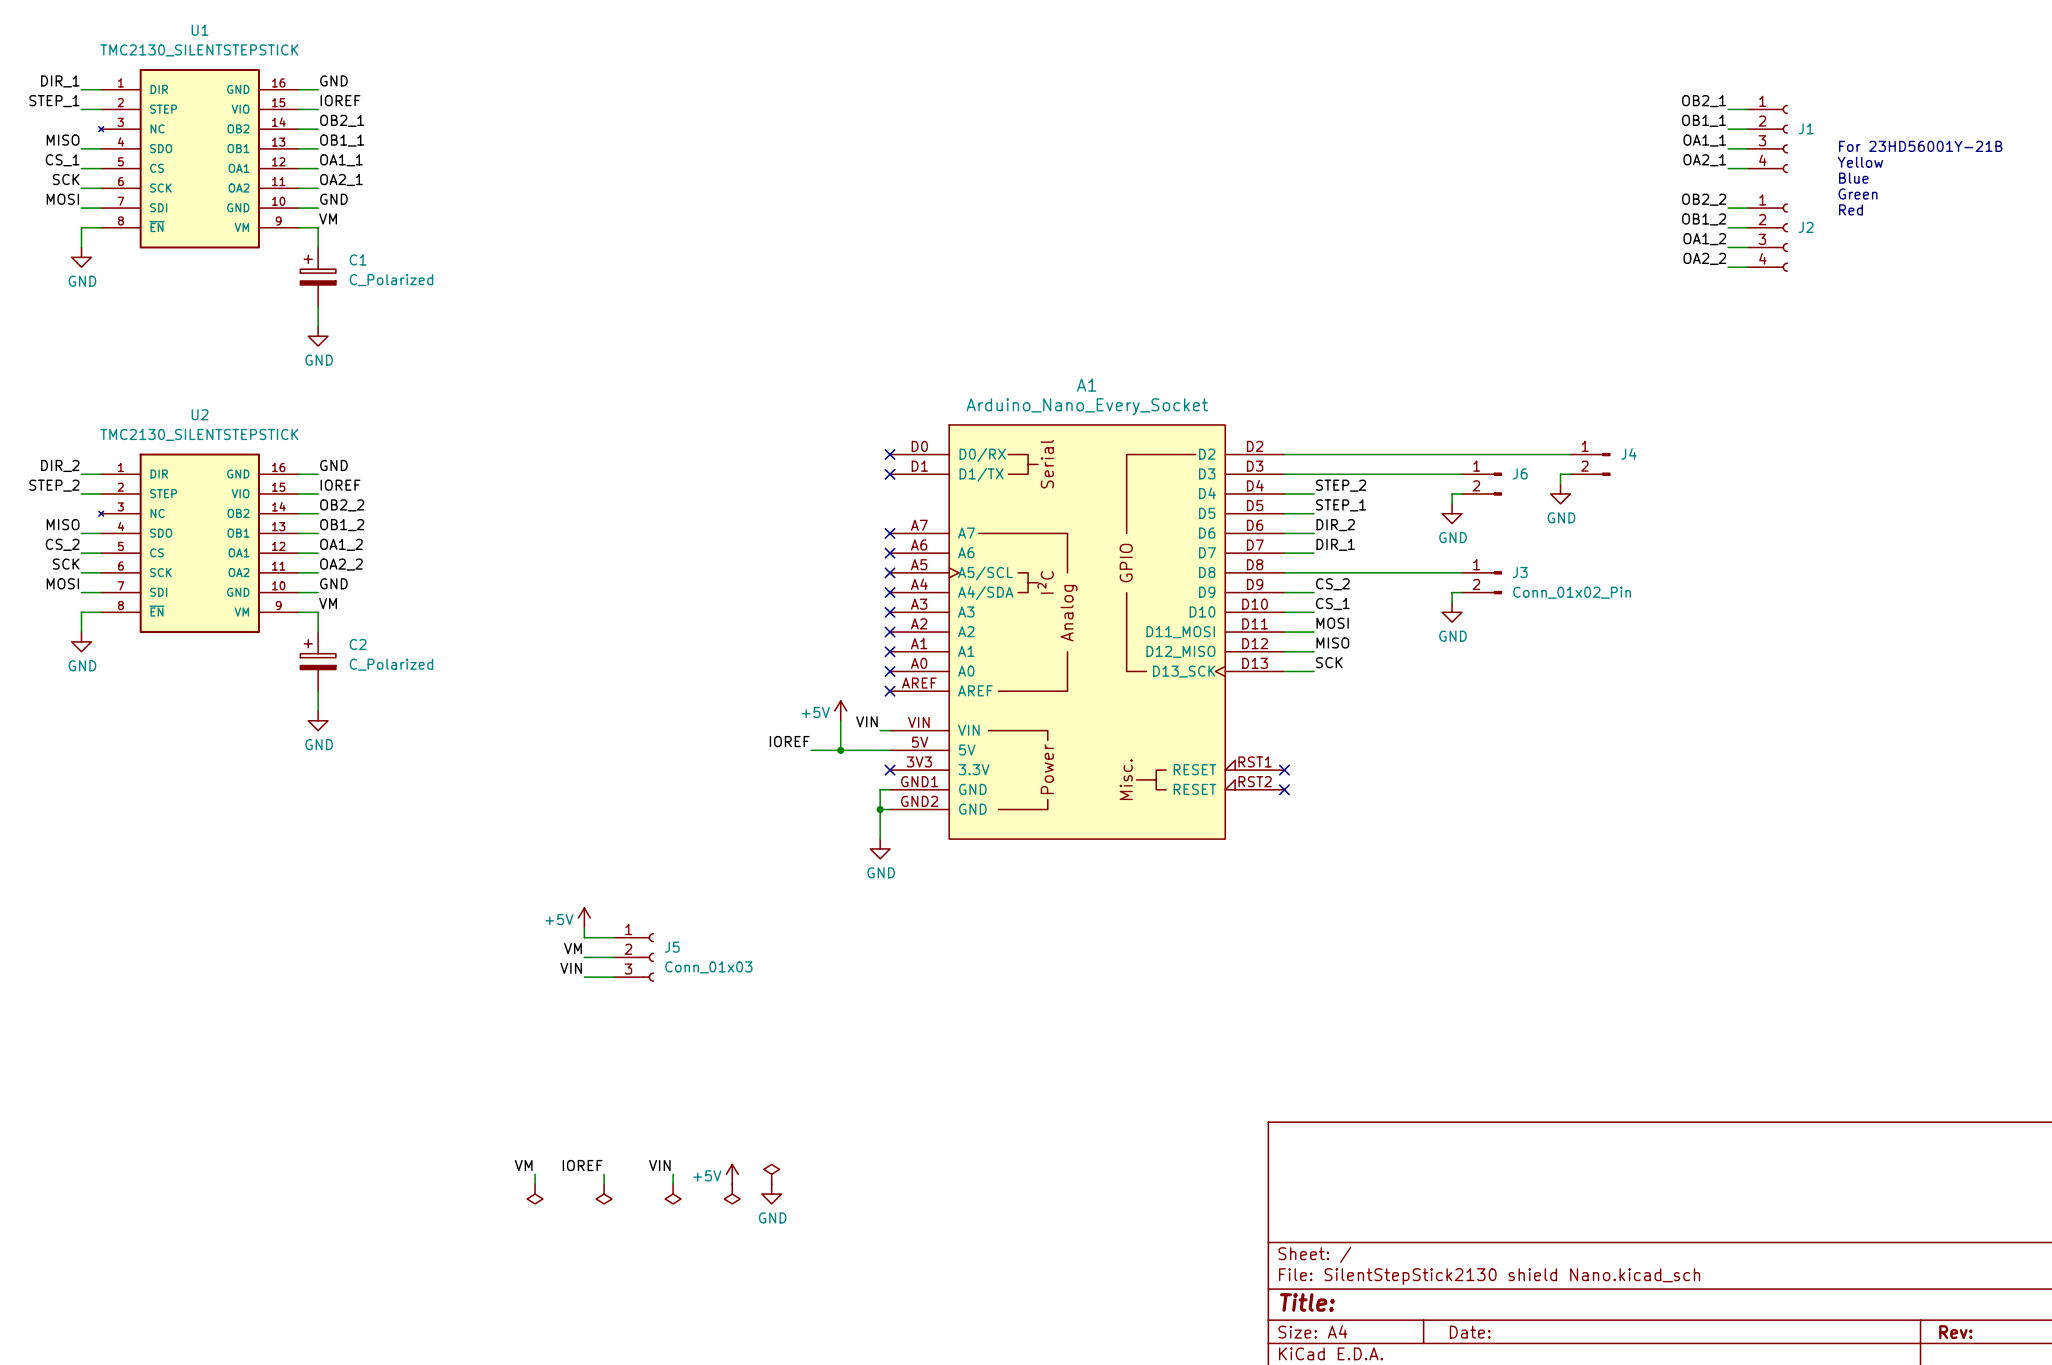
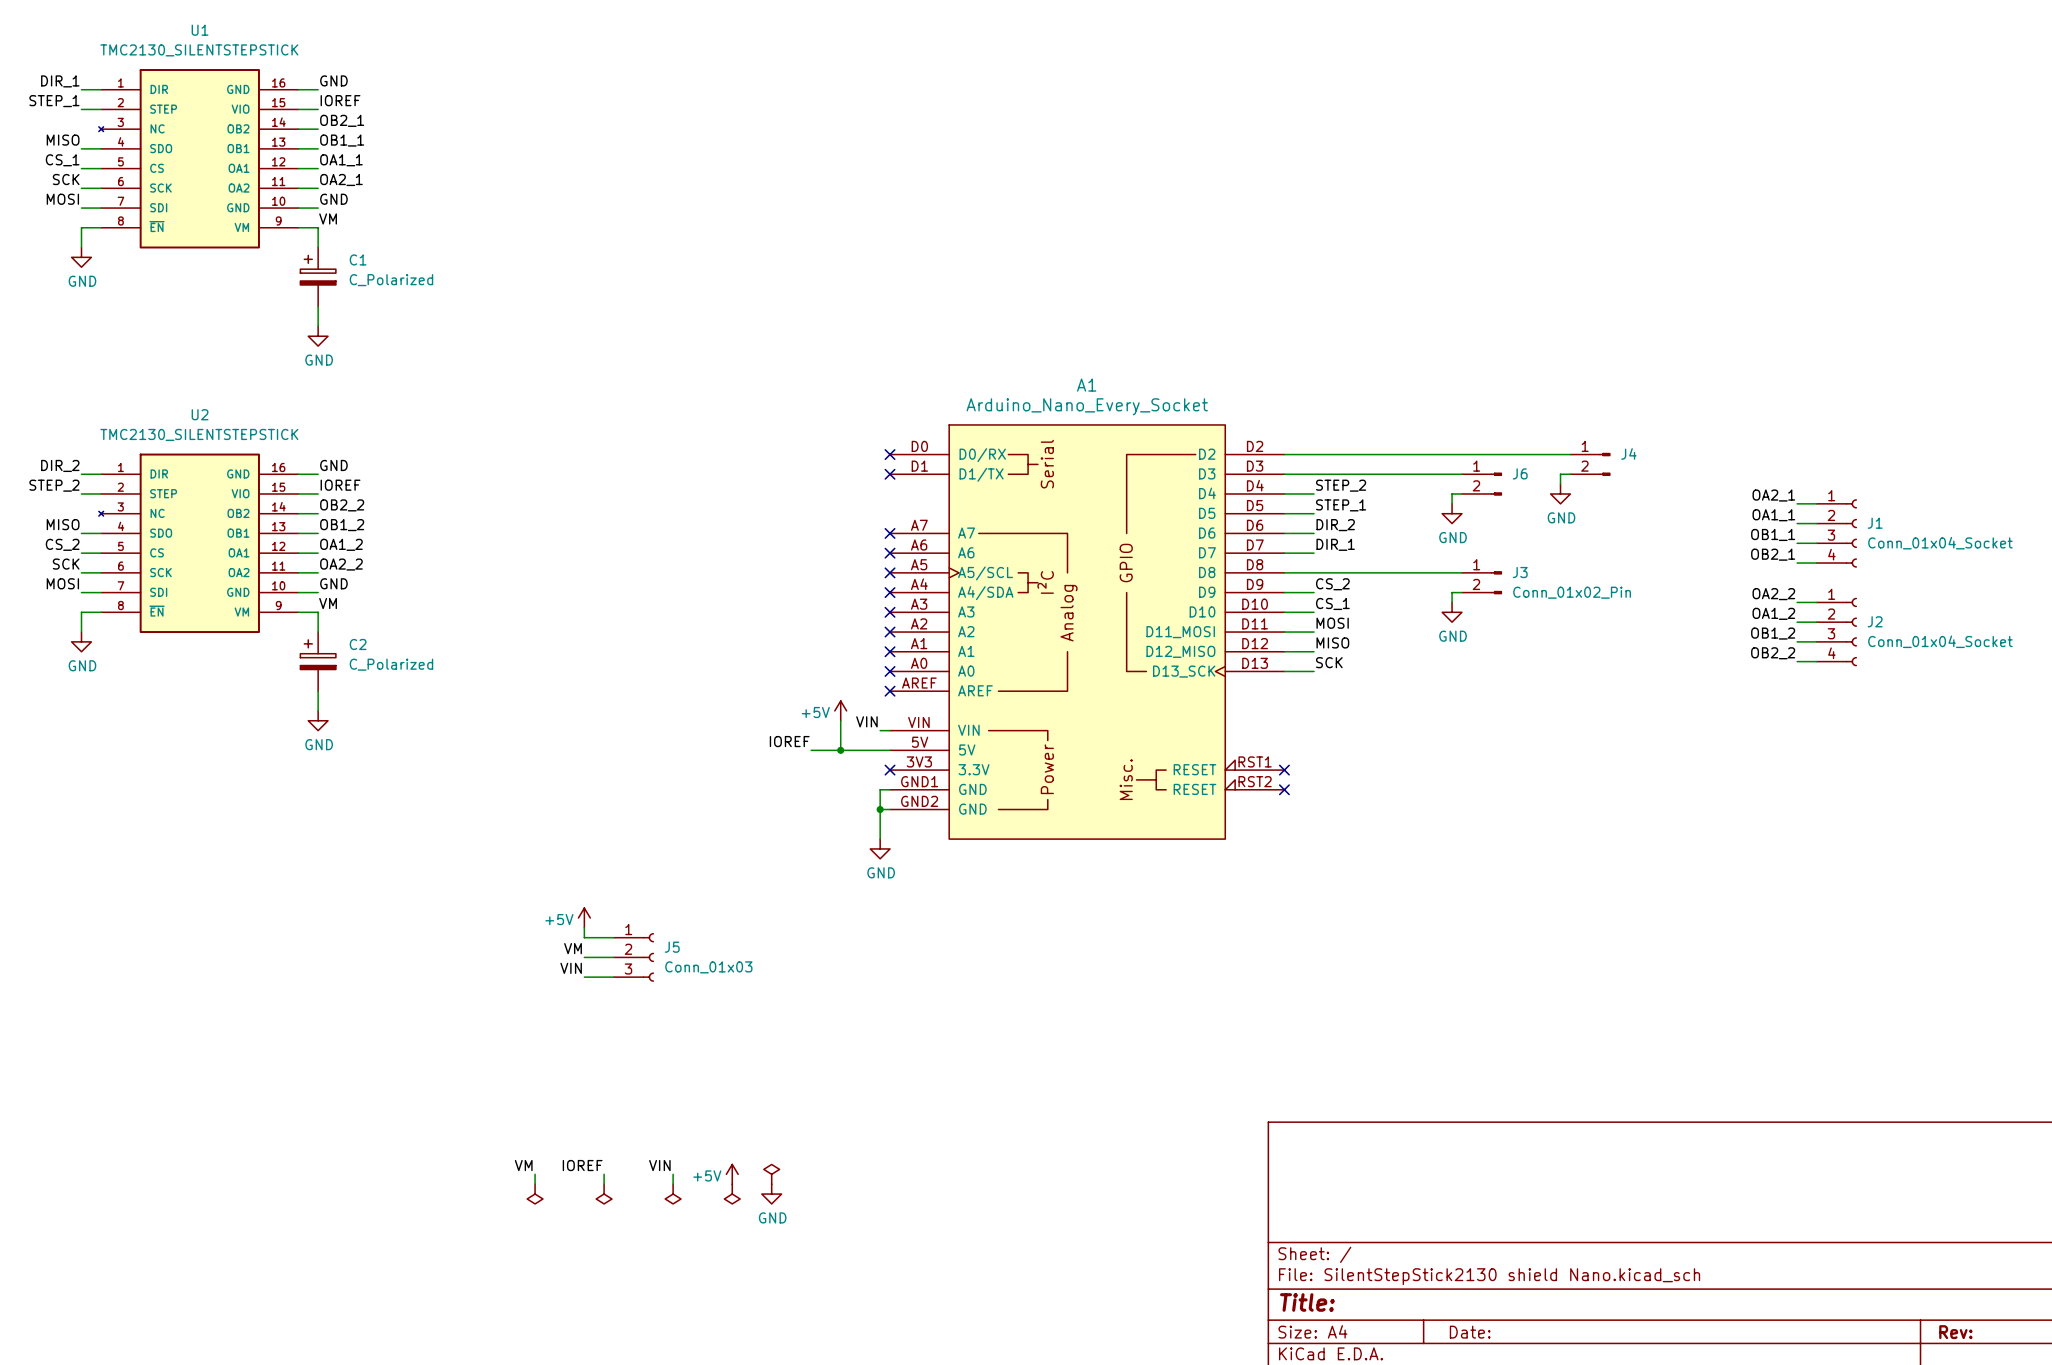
label: OB2_1 (1704, 101) -> none
wire: (1728, 109) (1747, 109) -> none
label: OB1_1 (1704, 120) -> none
wire: (1728, 129) (1747, 129) -> none
J1 position: (1767, 139) -> (1836, 533)
label: OA1_1 (1704, 140) -> none
text: For 23HD56001Y-21B (1920, 146) -> none
wire: (1728, 148) (1747, 148) -> none
label: OA2_1 (1704, 160) -> none
text: Yellow (1860, 162) -> none
wire: (1728, 168) (1747, 168) -> none
text: Blue (1853, 178) -> none
text: Green (1858, 194) -> none
label: OB2_2 (1704, 199) -> none
wire: (1728, 208) (1747, 208) -> none
text: Red (1850, 209) -> none
label: OB1_2 (1704, 219) -> none
wire: (1728, 227) (1747, 227) -> none
J2 position: (1767, 237) -> (1836, 632)
label: OA1_2 (1704, 239) -> none
wire: (1728, 247) (1747, 247) -> none
label: OA2_2 (1704, 258) -> none
wire: (1728, 267) (1747, 267) -> none
label: none -> OA2_1 (1773, 495)
wire: none -> (1797, 503) (1816, 503)
label: none -> OA1_1 (1773, 515)
wire: none -> (1797, 523) (1816, 523)
label: none -> OB1_1 (1773, 534)
wire: none -> (1797, 543) (1816, 543)
J1 value: none -> Conn_01x04_Socket (1940, 543)
label: none -> OB2_1 (1773, 554)
wire: none -> (1797, 563) (1816, 563)
label: none -> OA2_2 (1773, 594)
wire: none -> (1797, 602) (1816, 602)
label: none -> OA1_2 (1773, 613)
wire: none -> (1797, 622) (1816, 622)
label: none -> OB1_2 (1773, 633)
wire: none -> (1797, 641) (1816, 641)
J2 value: none -> Conn_01x04_Socket (1940, 641)
label: none -> OB2_2 (1773, 653)
wire: none -> (1797, 661) (1816, 661)

